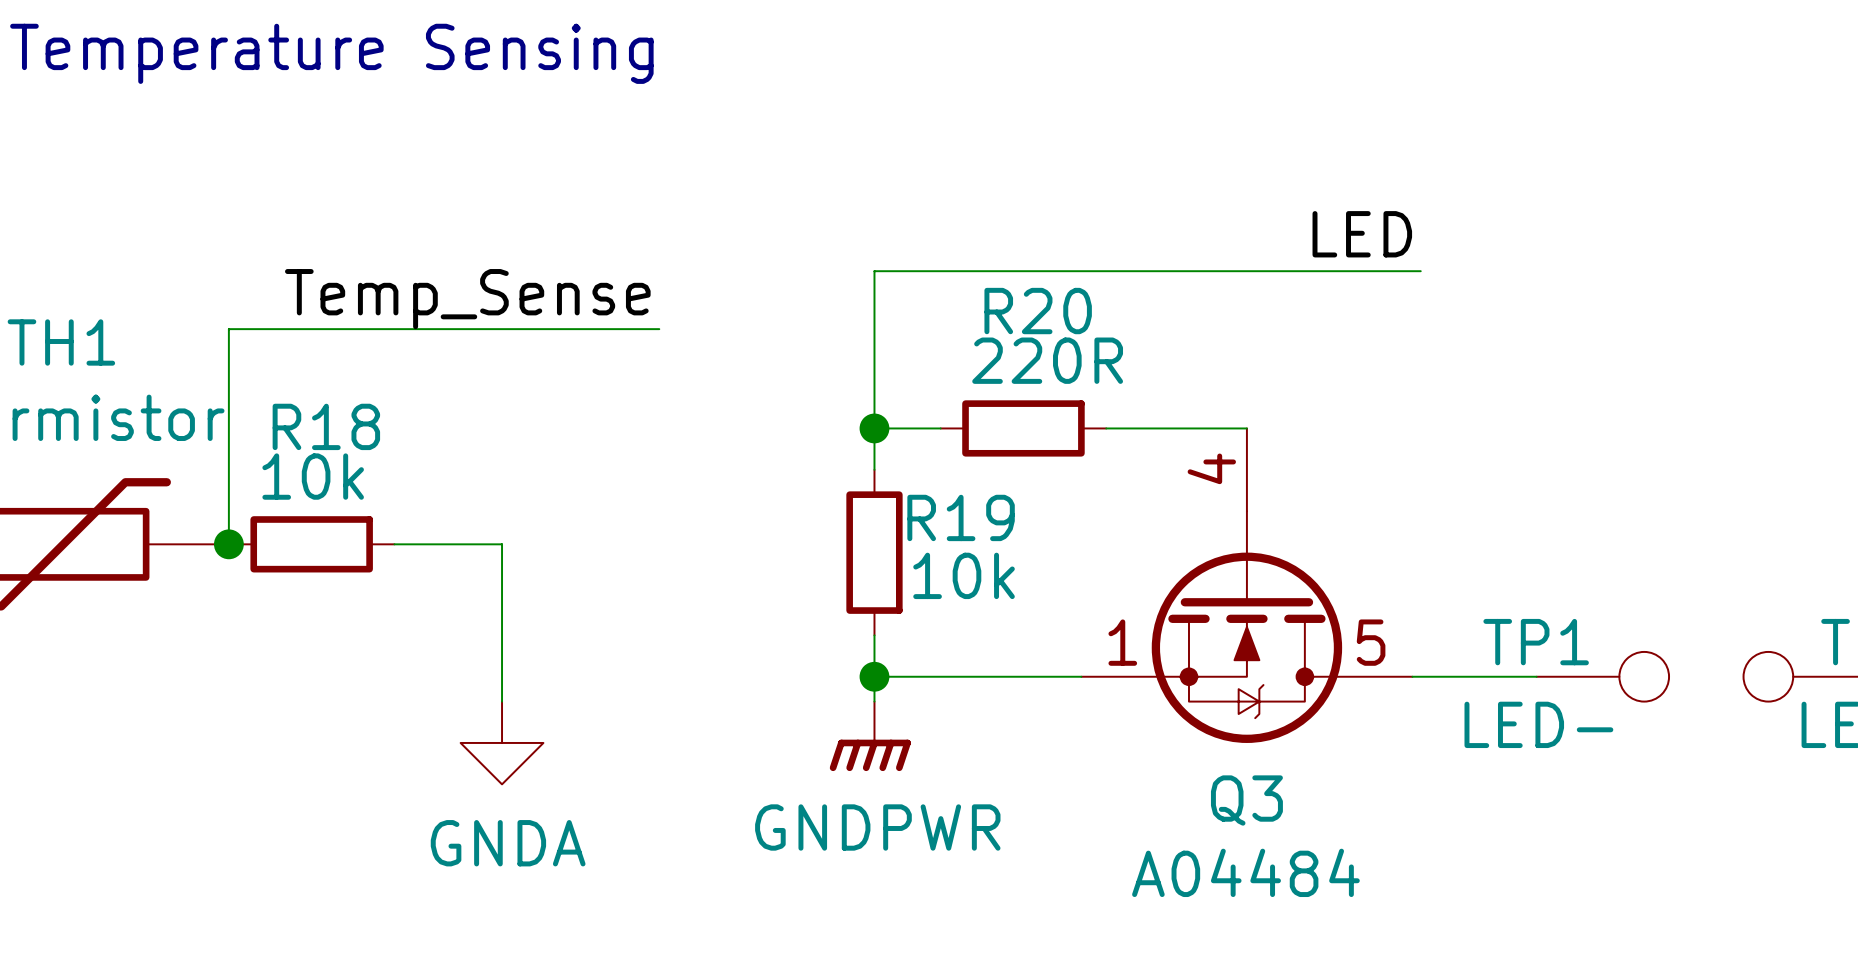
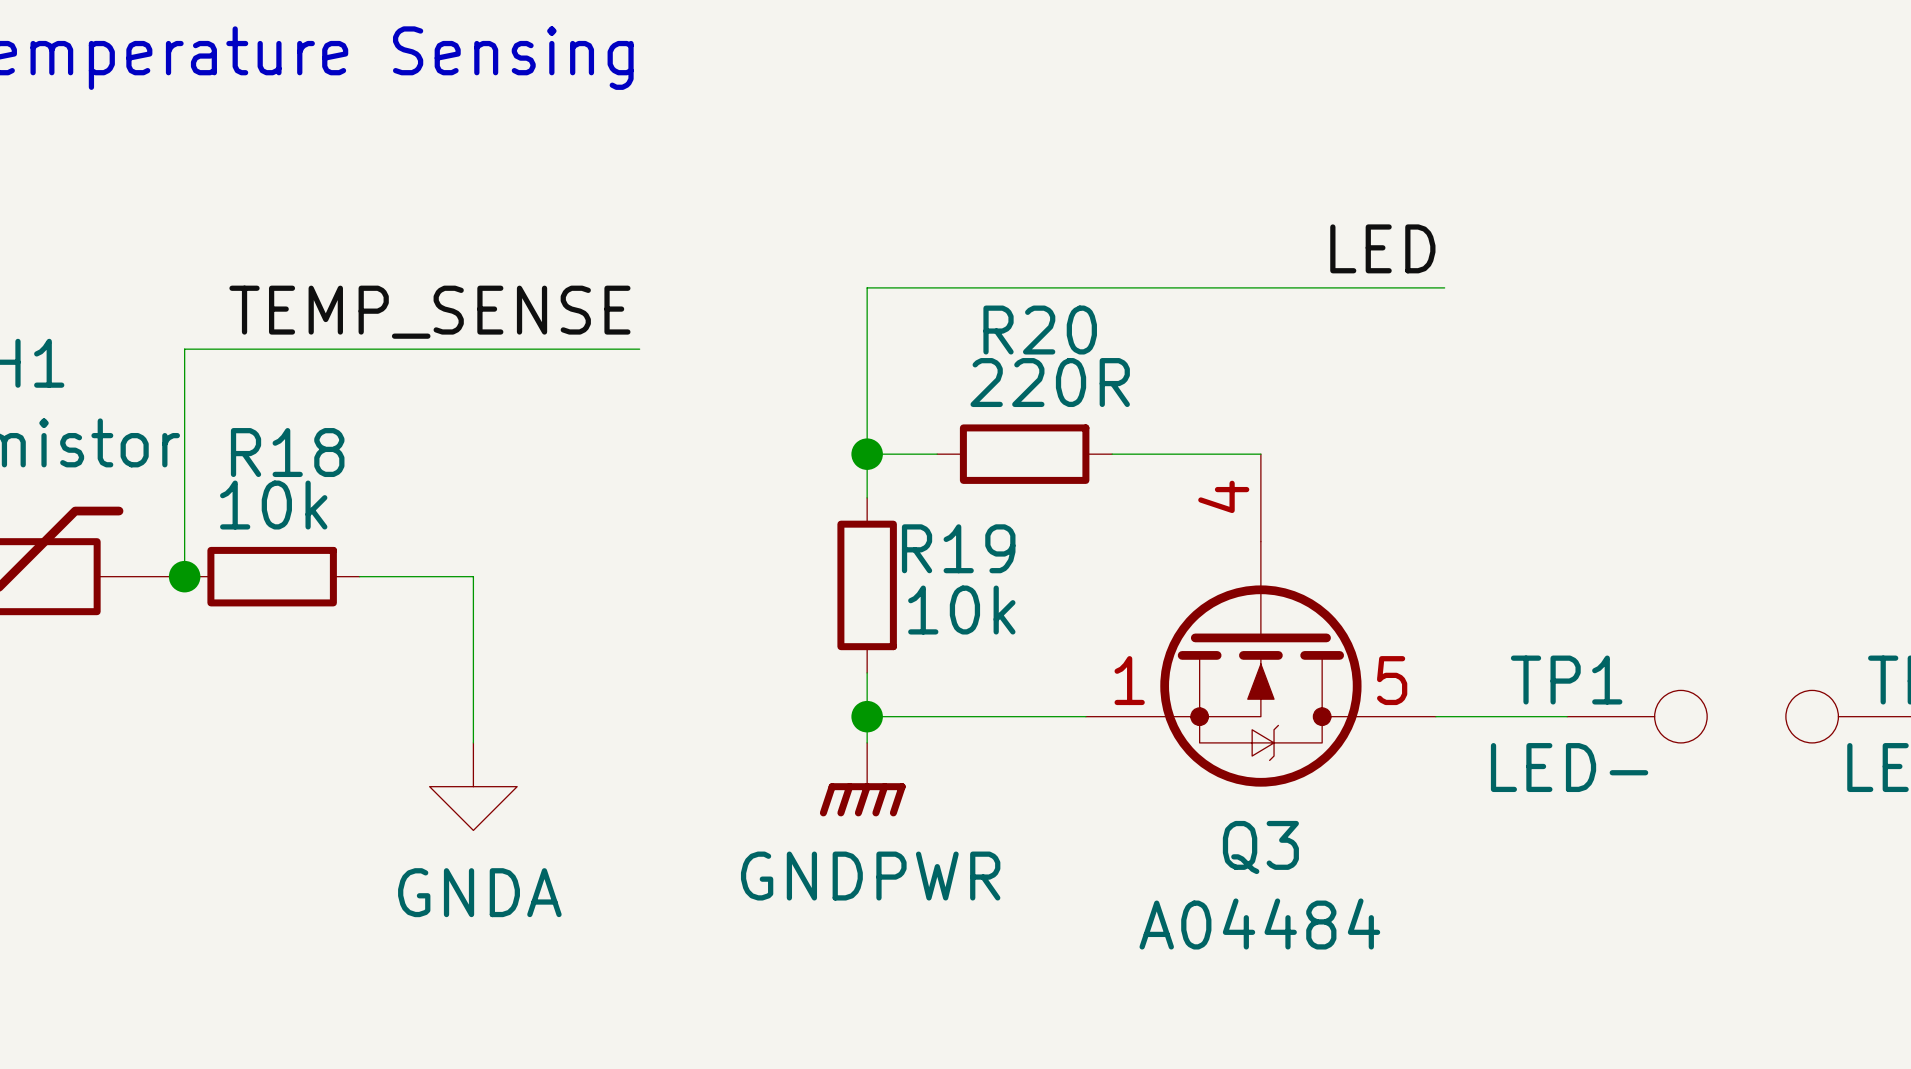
label: Temp_Sense (467, 299) -> TEMP_SENSE (429, 312)

